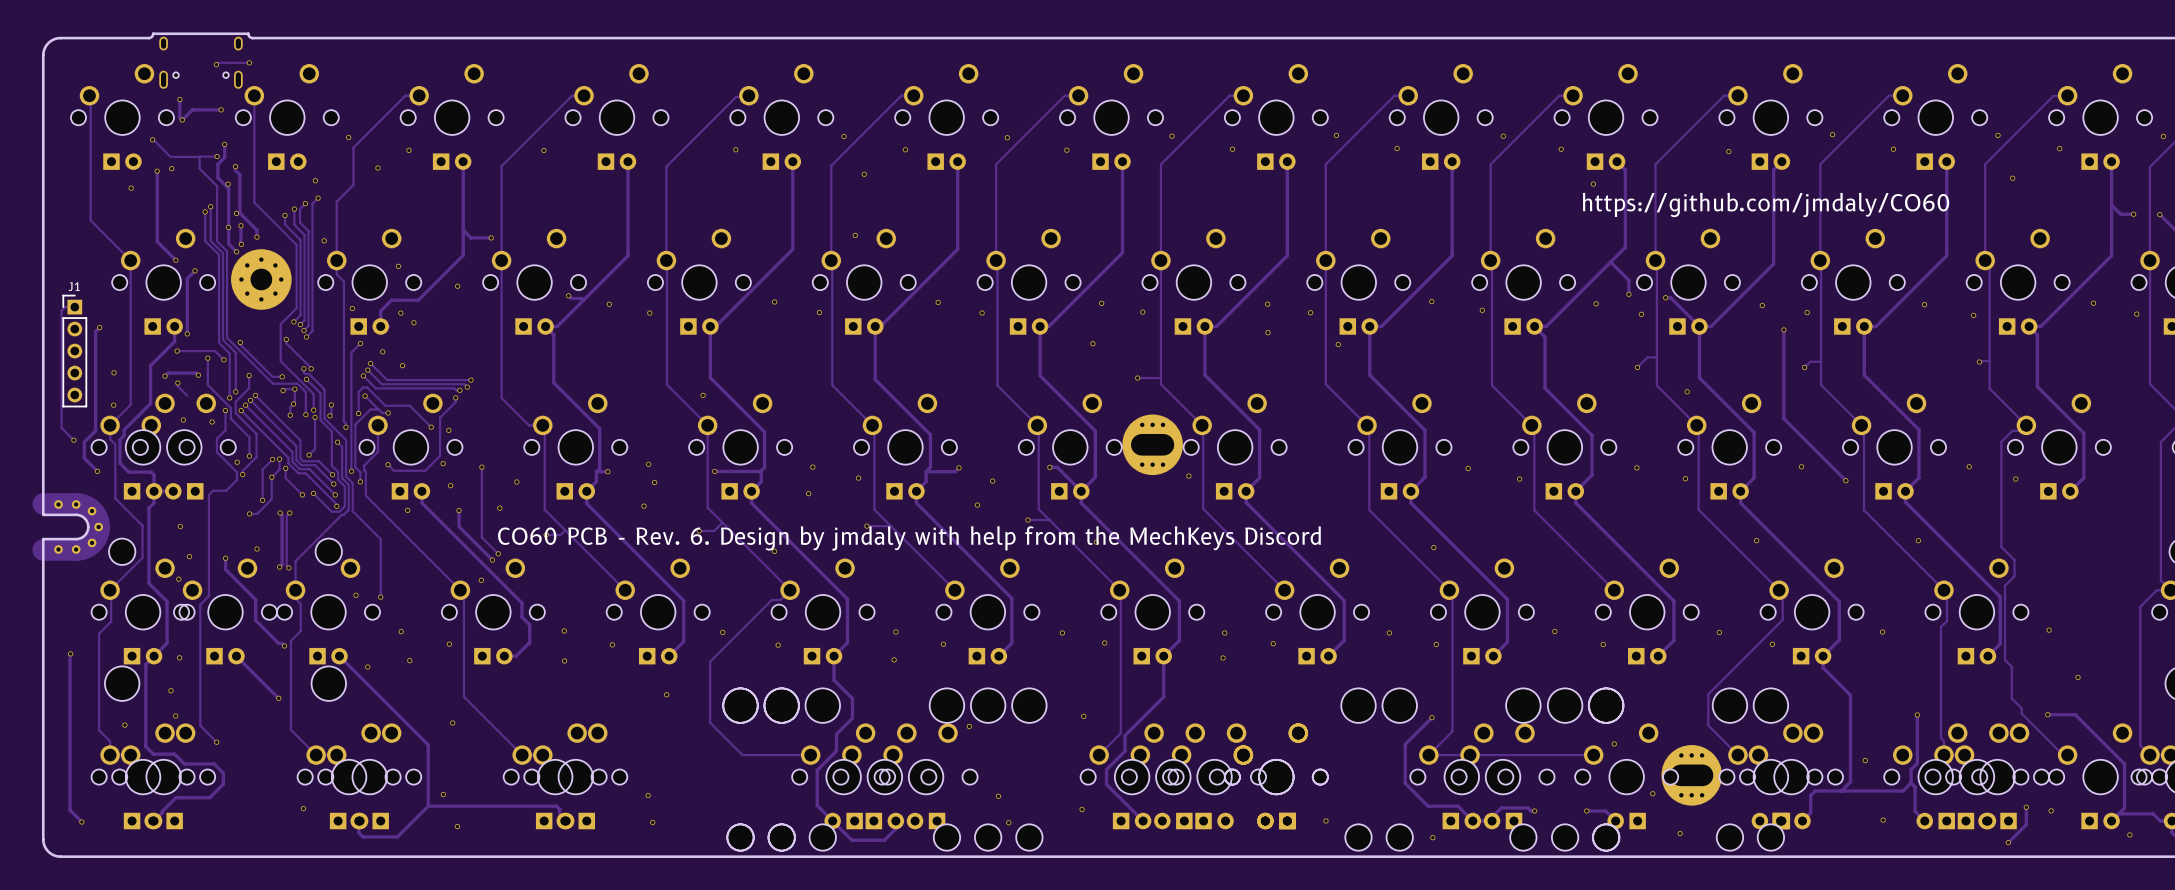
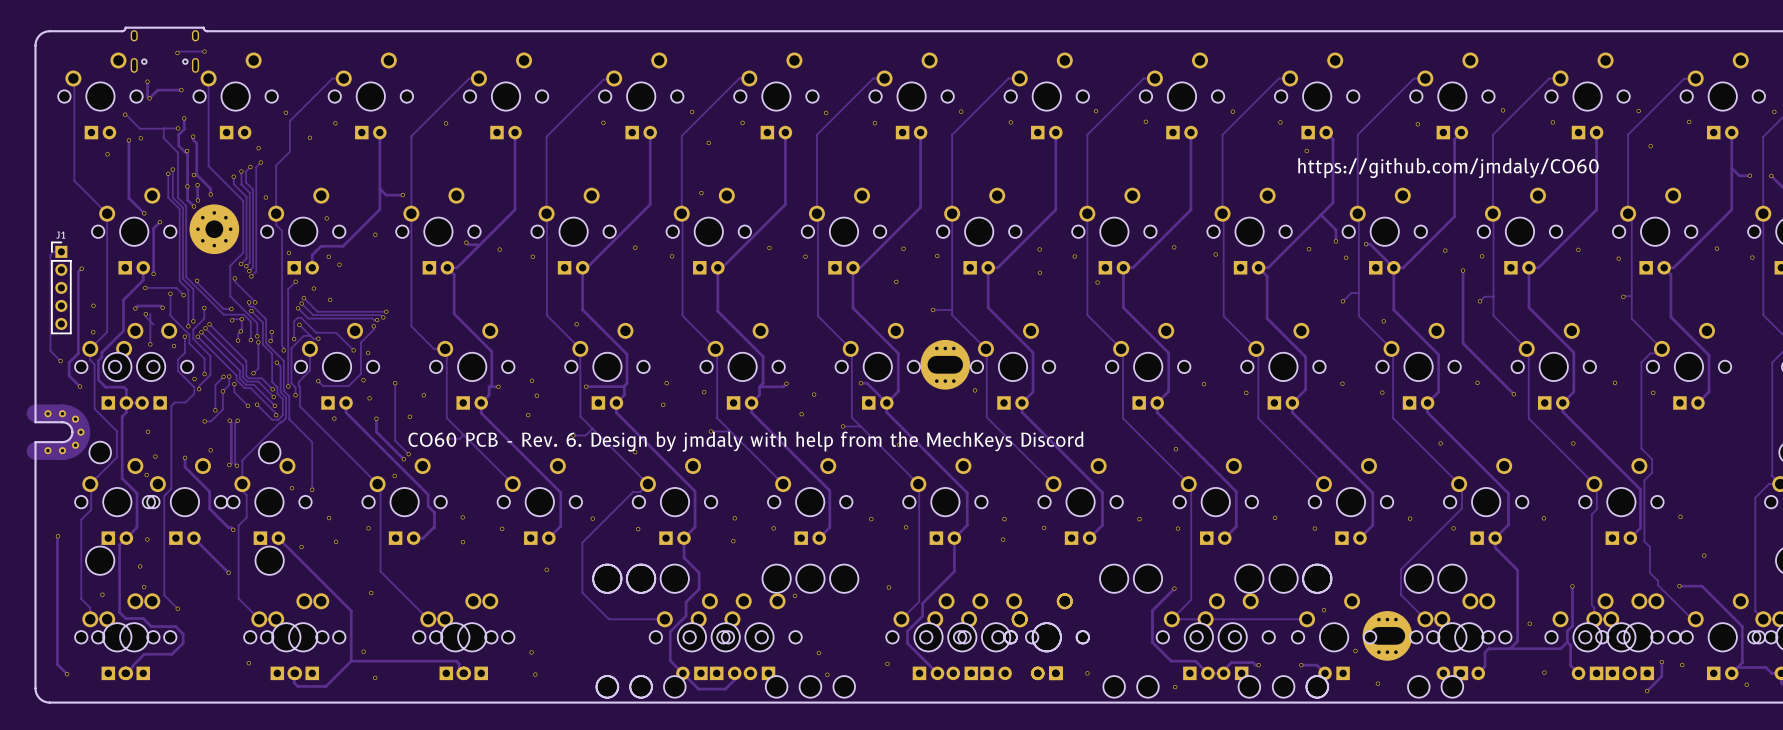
track: none -> (150, 314) (150, 344)

